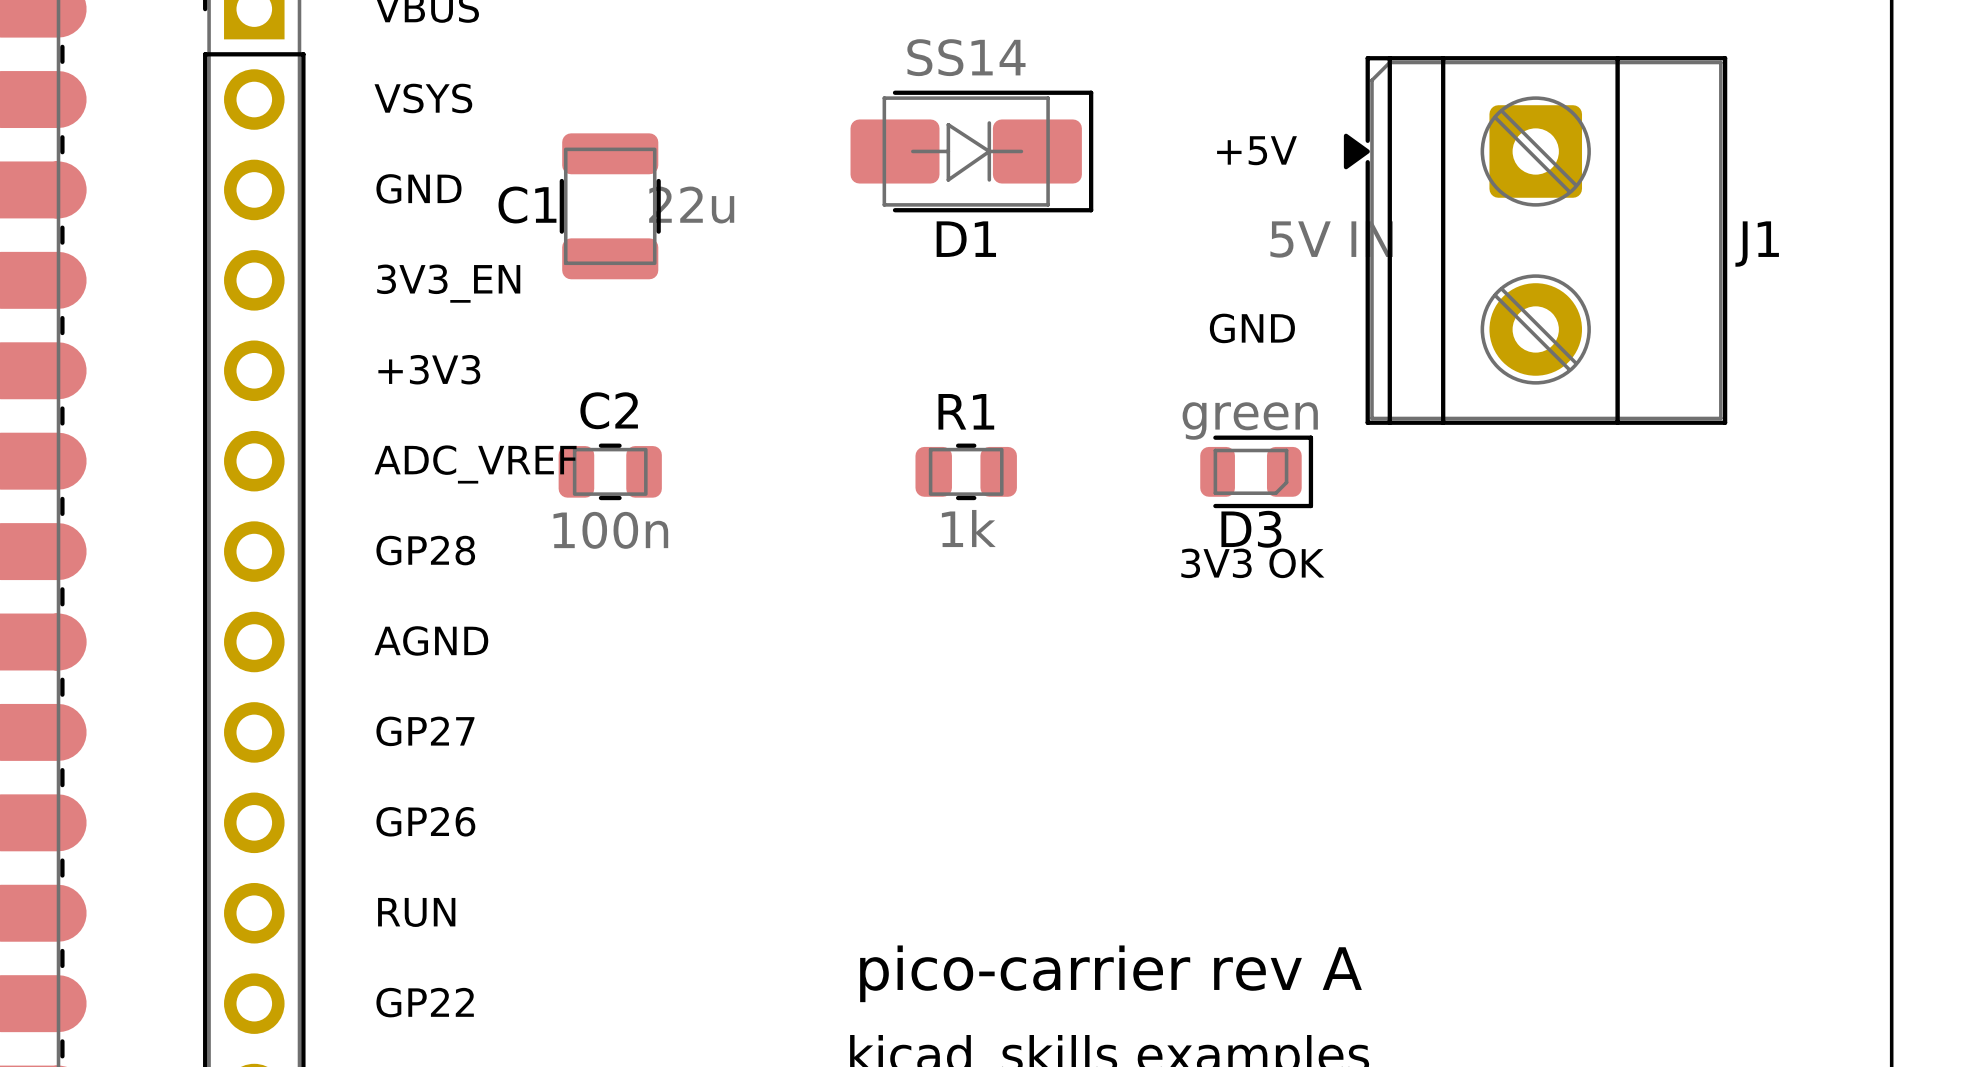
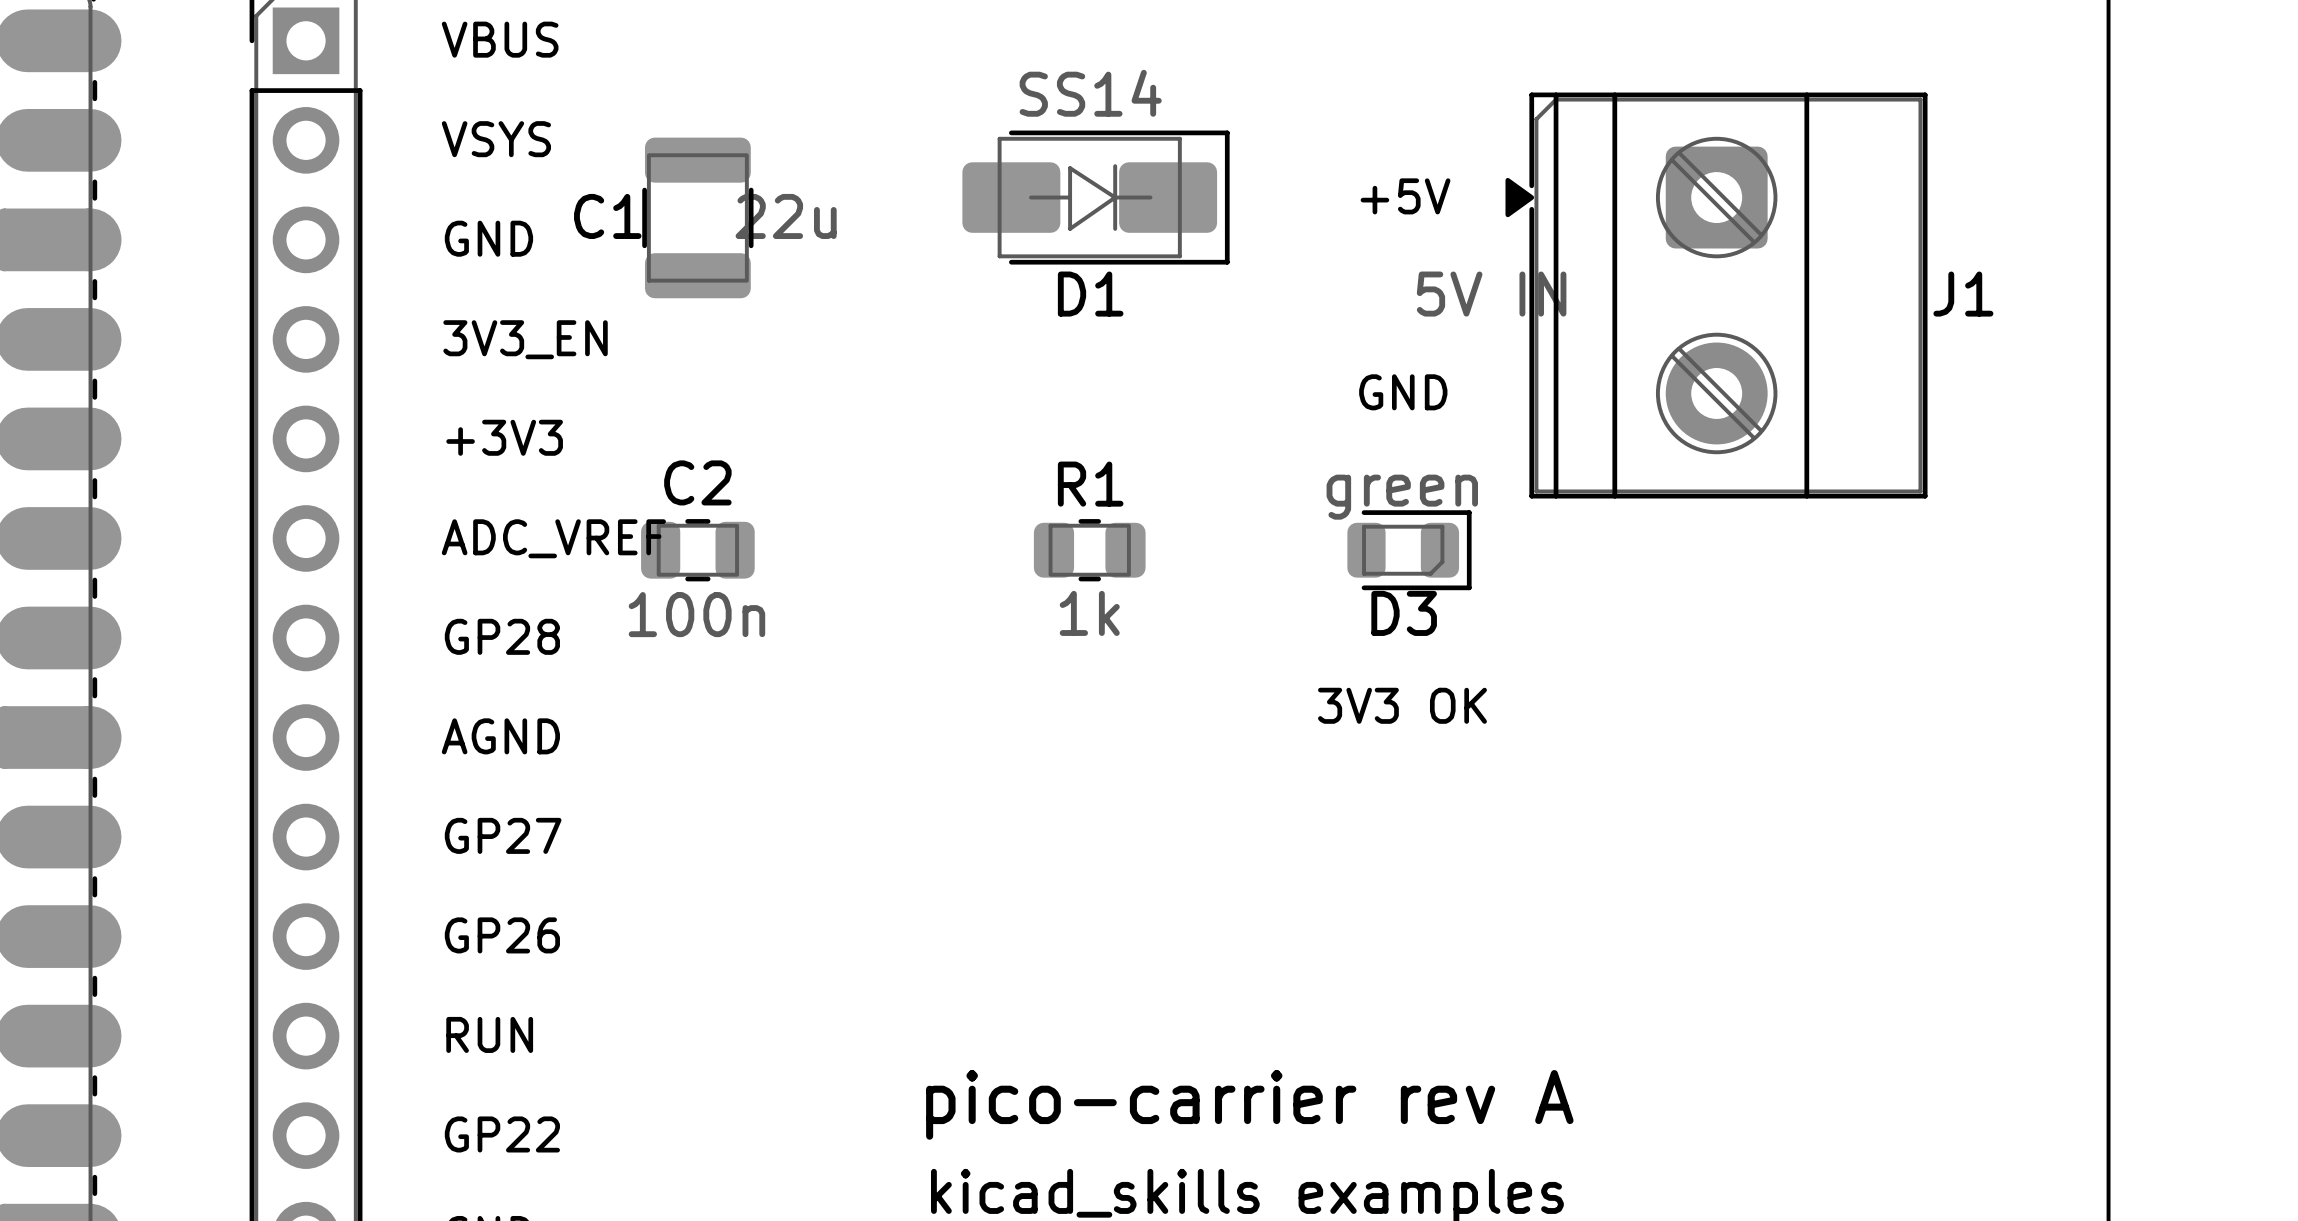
C1 position: (610, 206) -> (697, 217)
text position: 3V3 OK (1252, 563) -> 3V3 OK (1402, 705)

